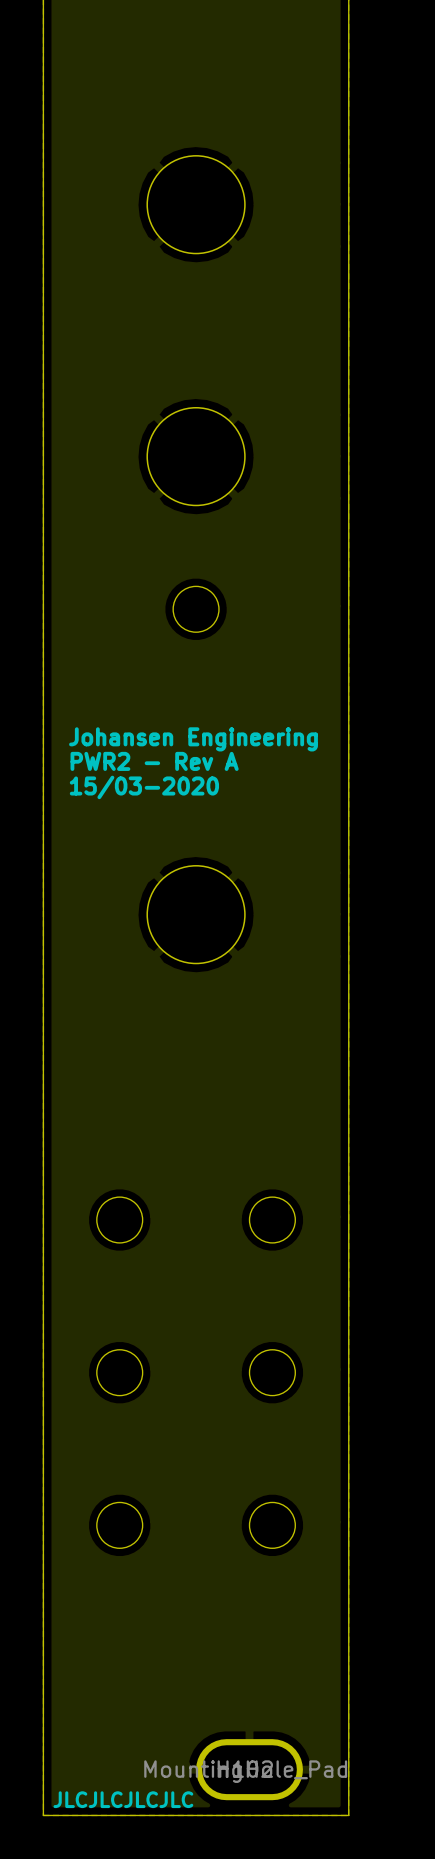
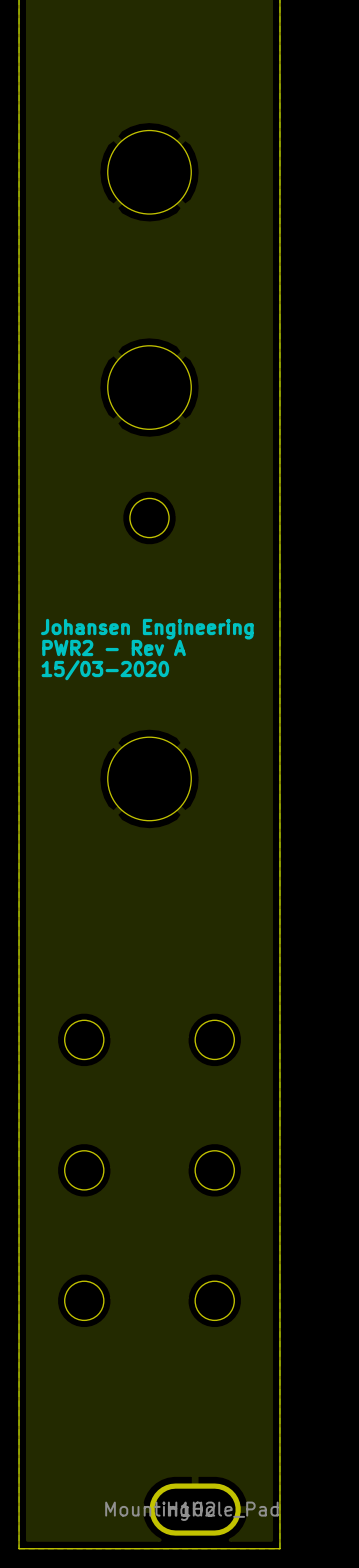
text: JLCJLCJLCJLC (123, 1799) -> none

